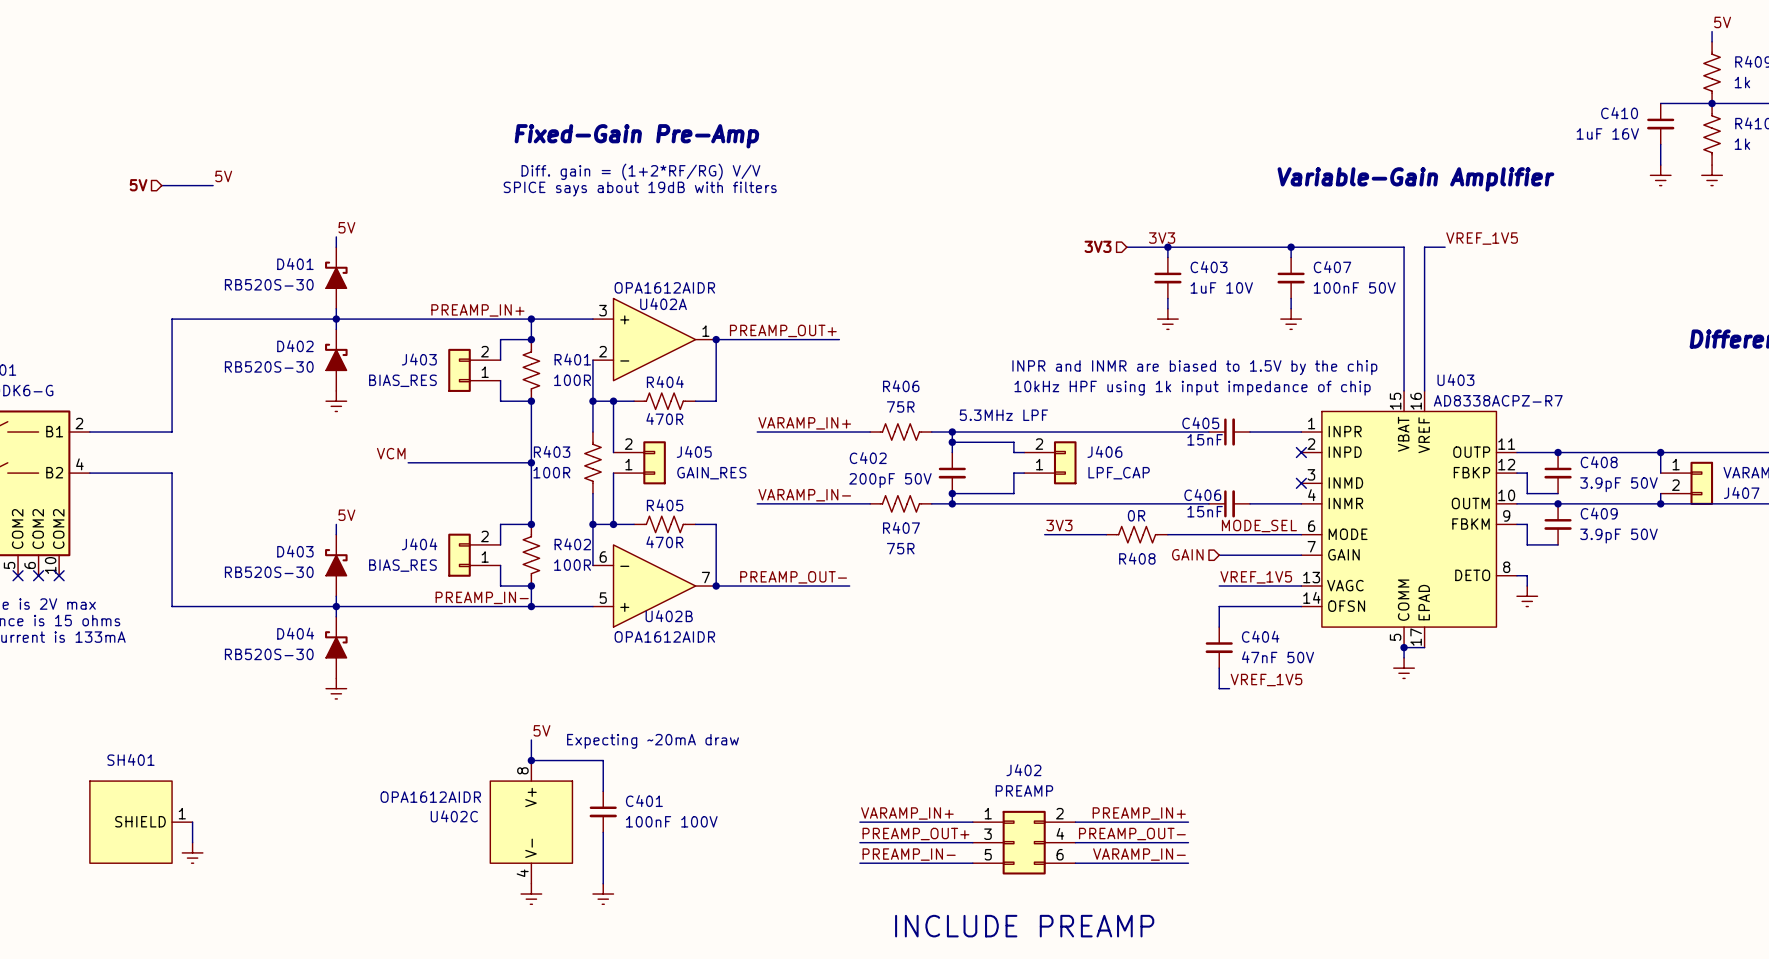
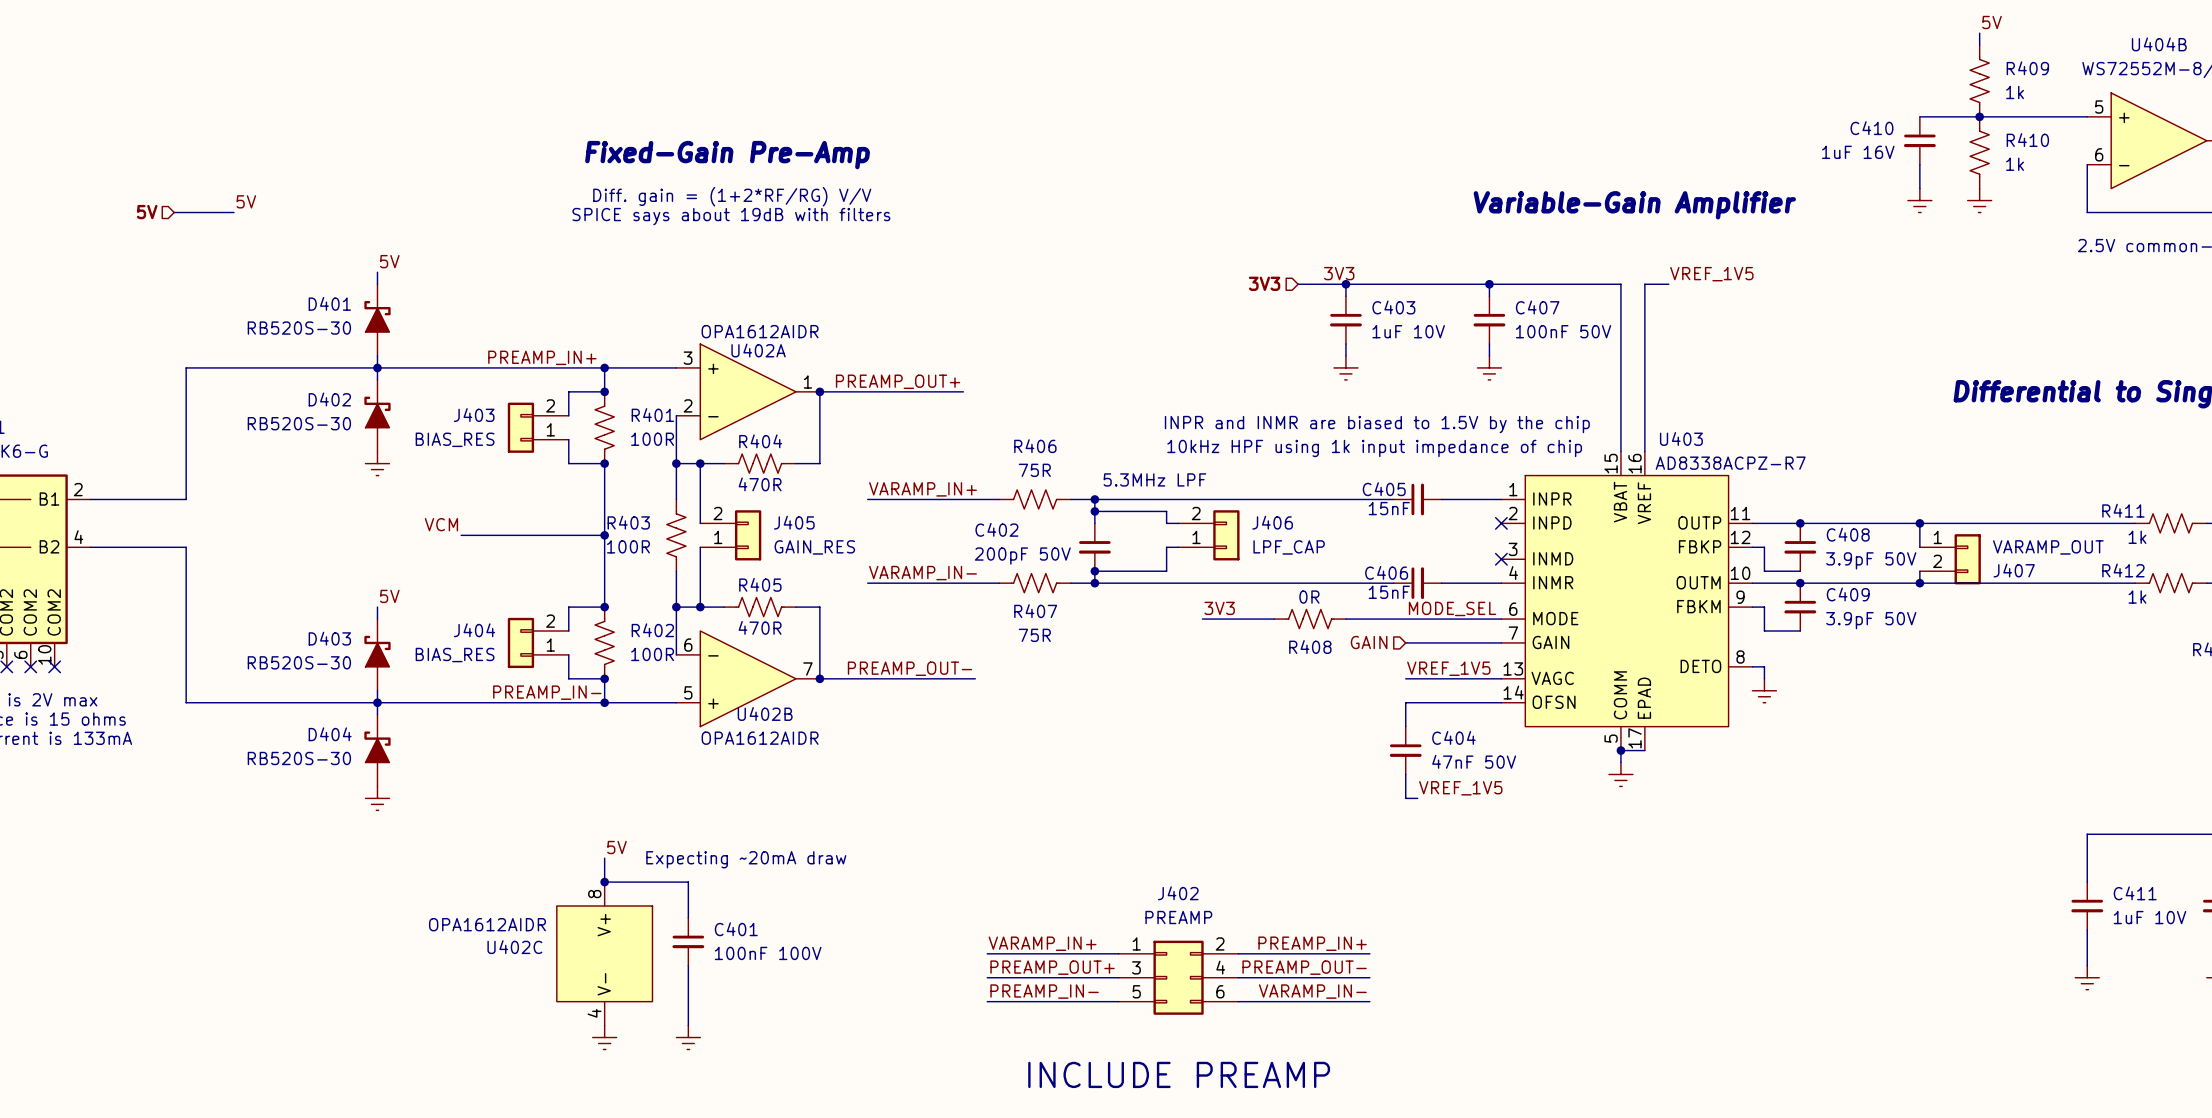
SH401: (141, 822) -> none
wire: (192, 822) (192, 842) -> none
power symbol: (192, 852) -> none

